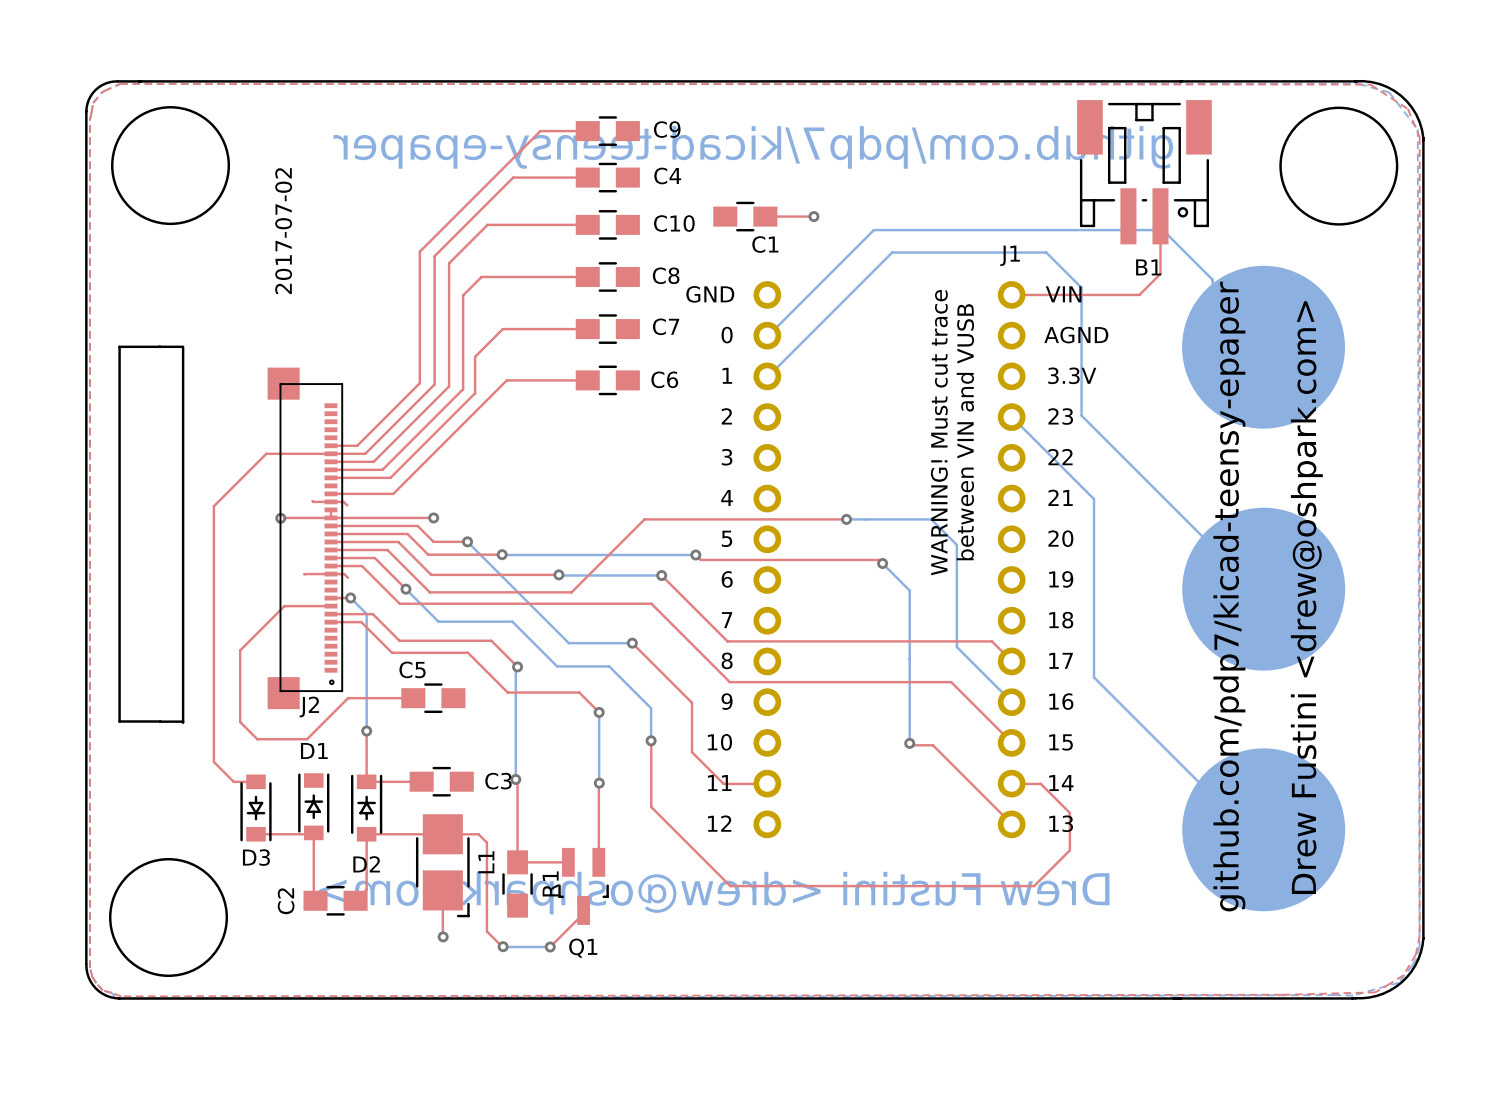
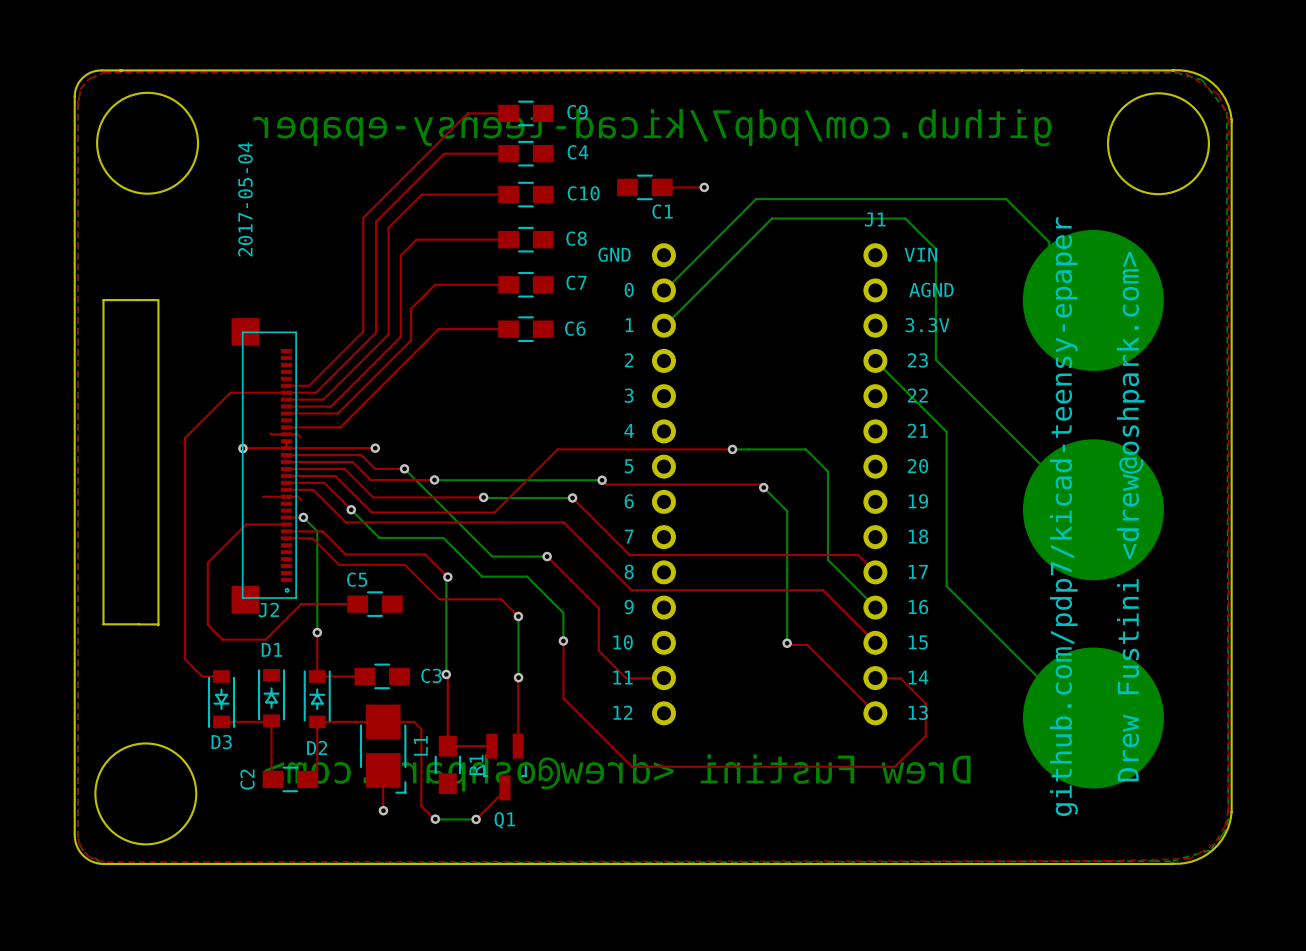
B1: (1144, 172) -> none
top track: (1160, 216) (1160, 273) (1139, 294) (1011, 294) -> none
text: 2017-07-02 (283, 231) -> 2017-05-04 (245, 199)
text: WARNING! Must cut trace (939, 432) -> none
text: between VIN and VUSB (965, 432) -> none

